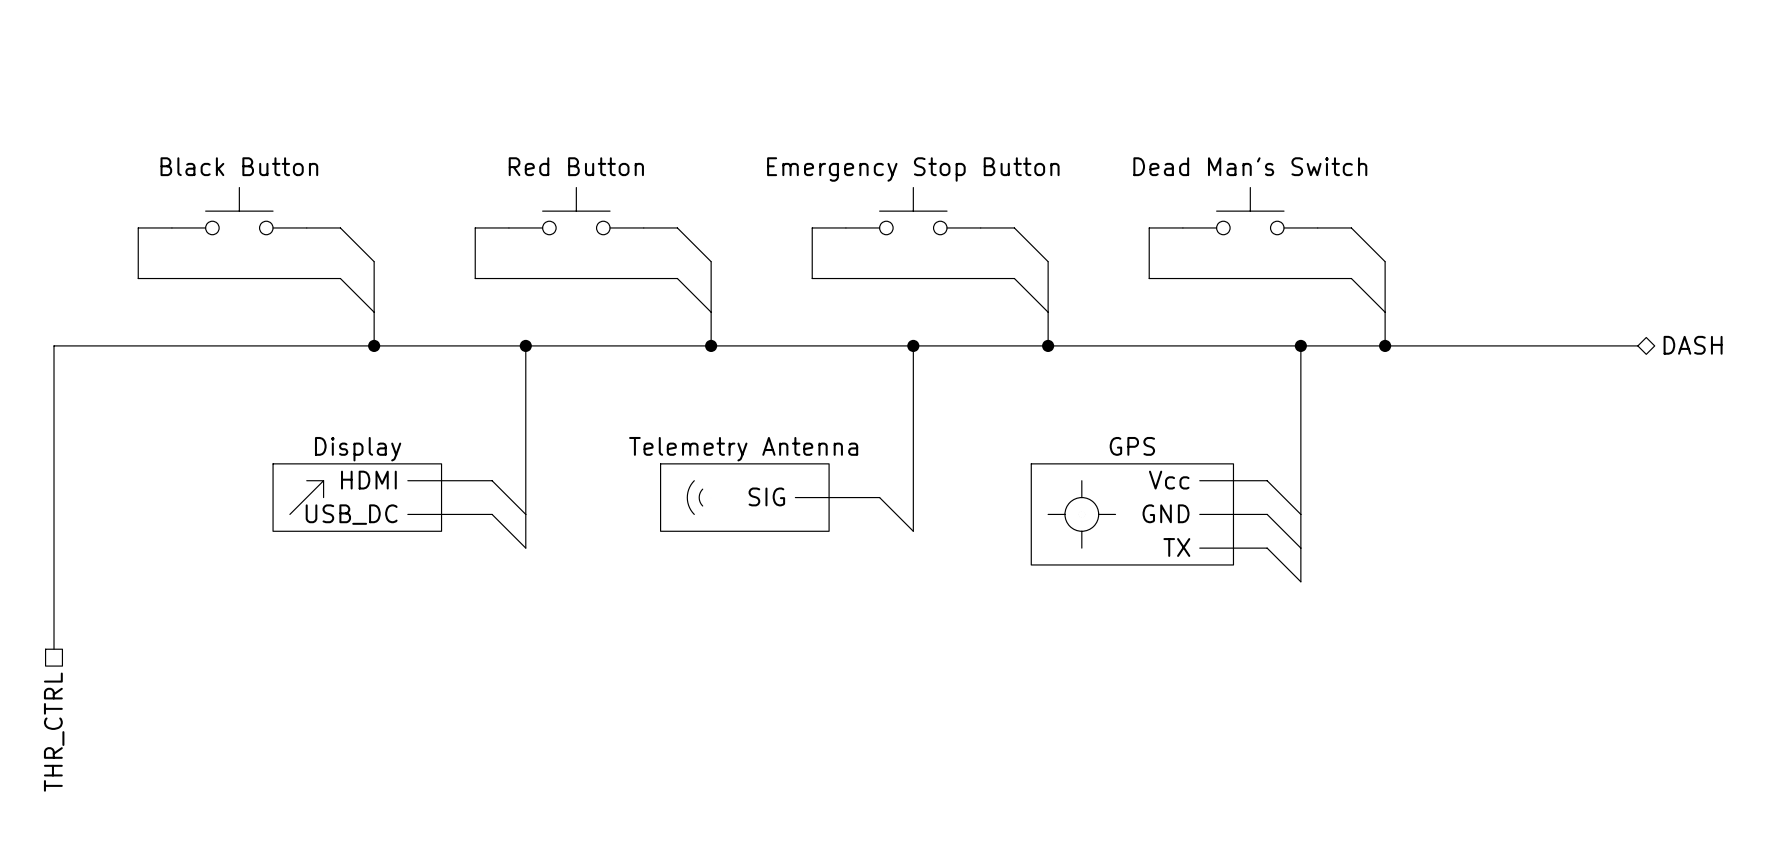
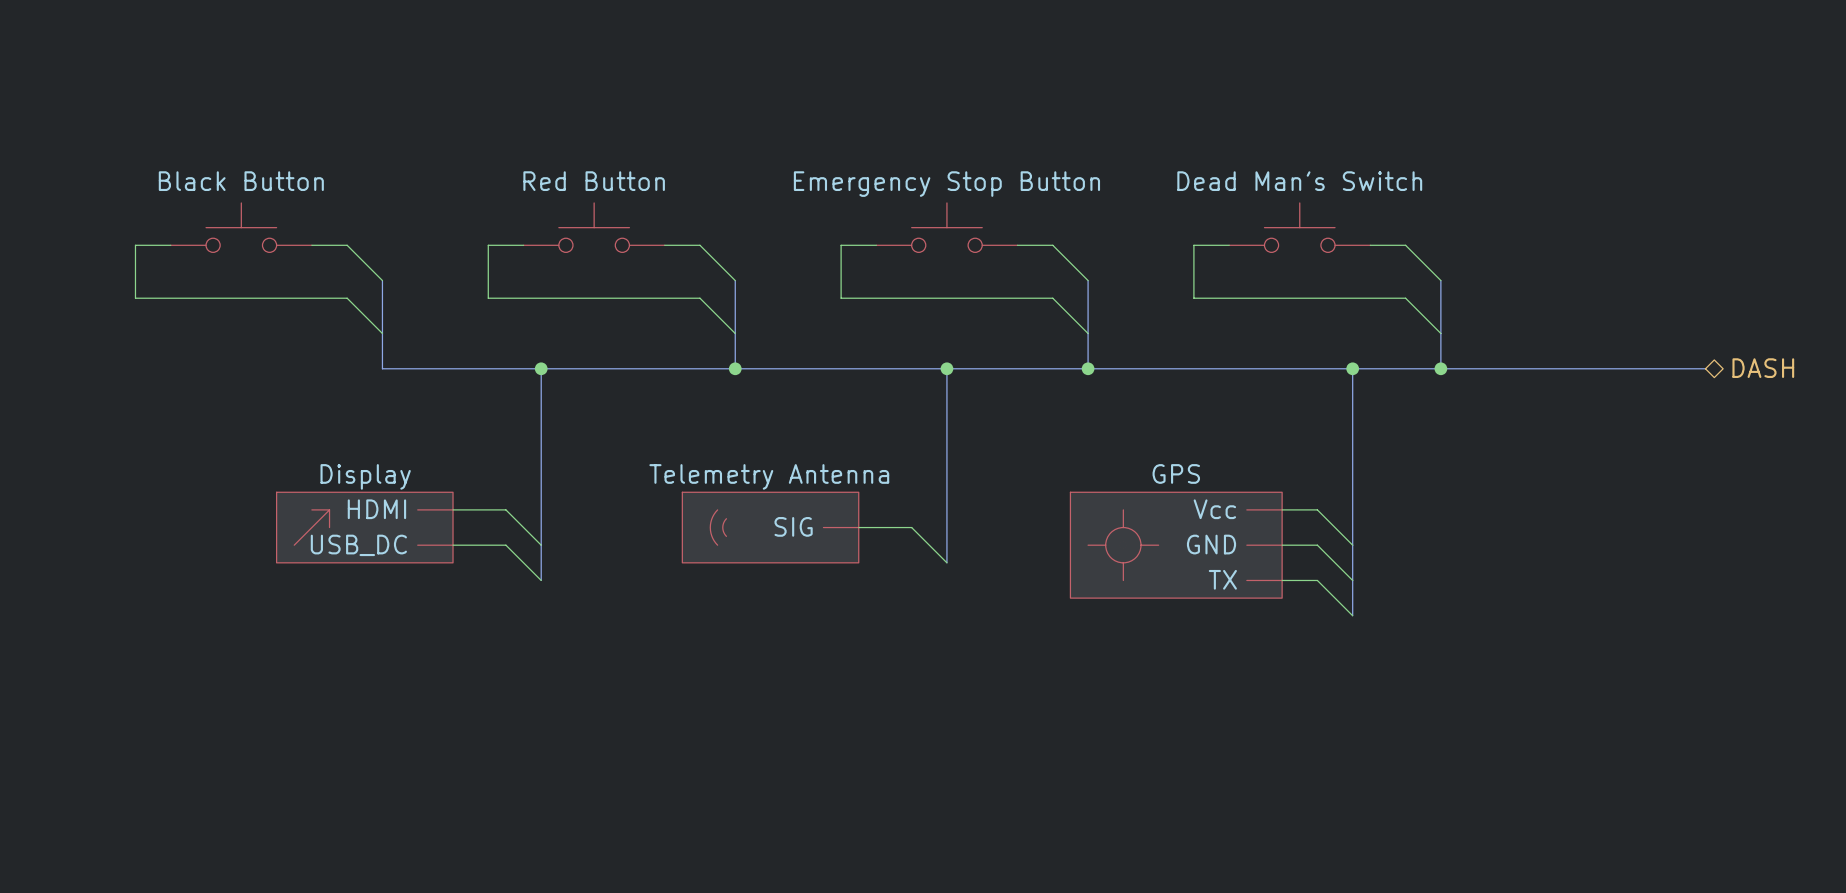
bus: (374, 345) (54, 345) (54, 649) -> none
junction: (374, 345) -> none
hierarchical label: THR_CTRL (54, 732) -> none

